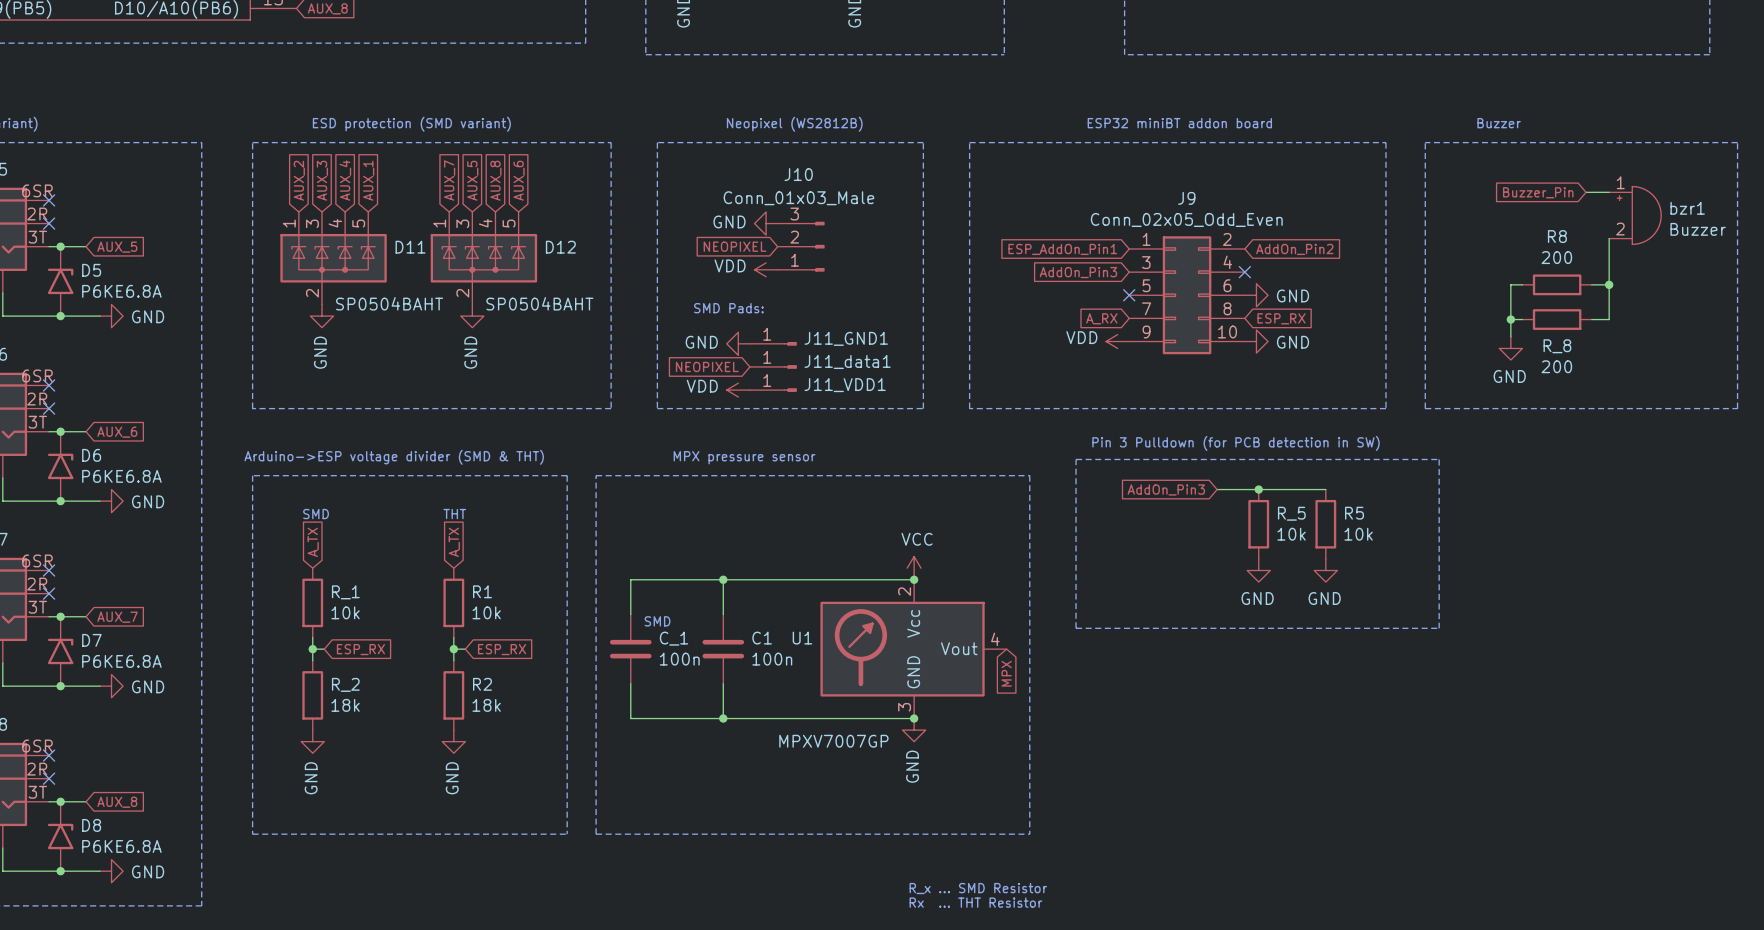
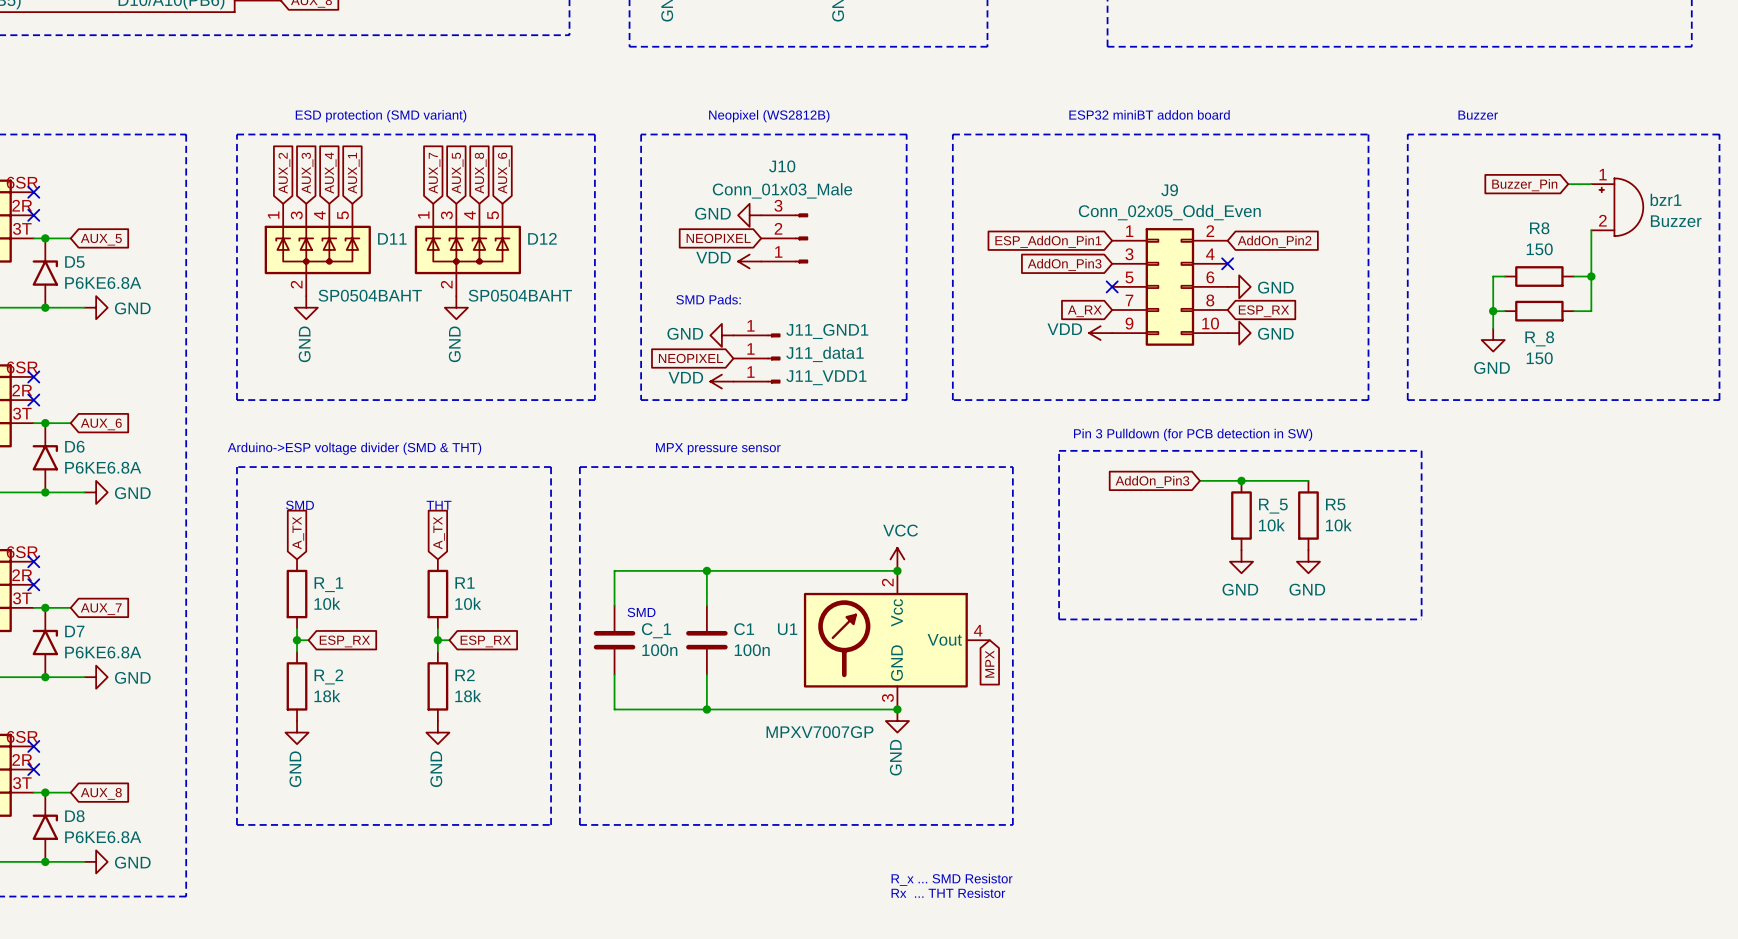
R8 value: 200 (1556, 257) -> 150 (1539, 249)
R_8 value: 200 (1556, 366) -> 150 (1539, 358)

